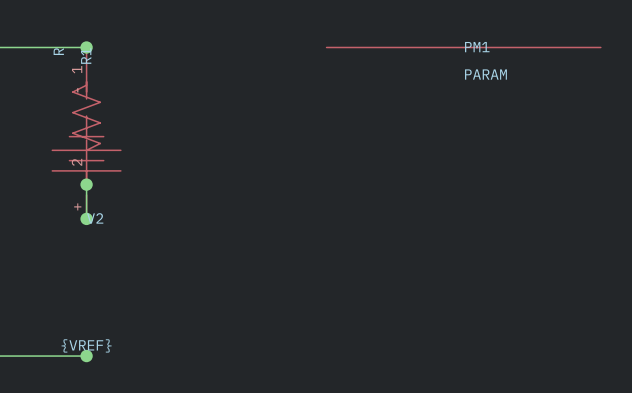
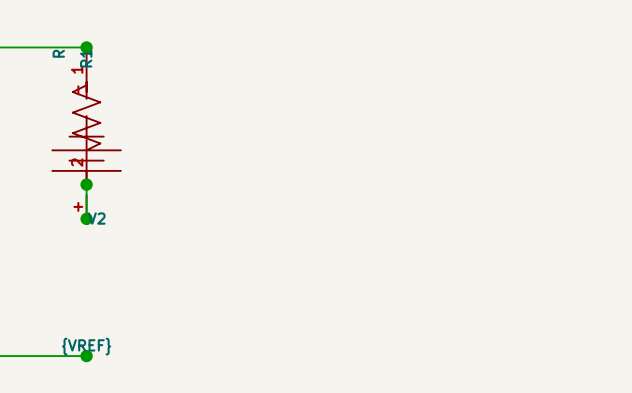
PM1: PARAM (463, 47) -> none

